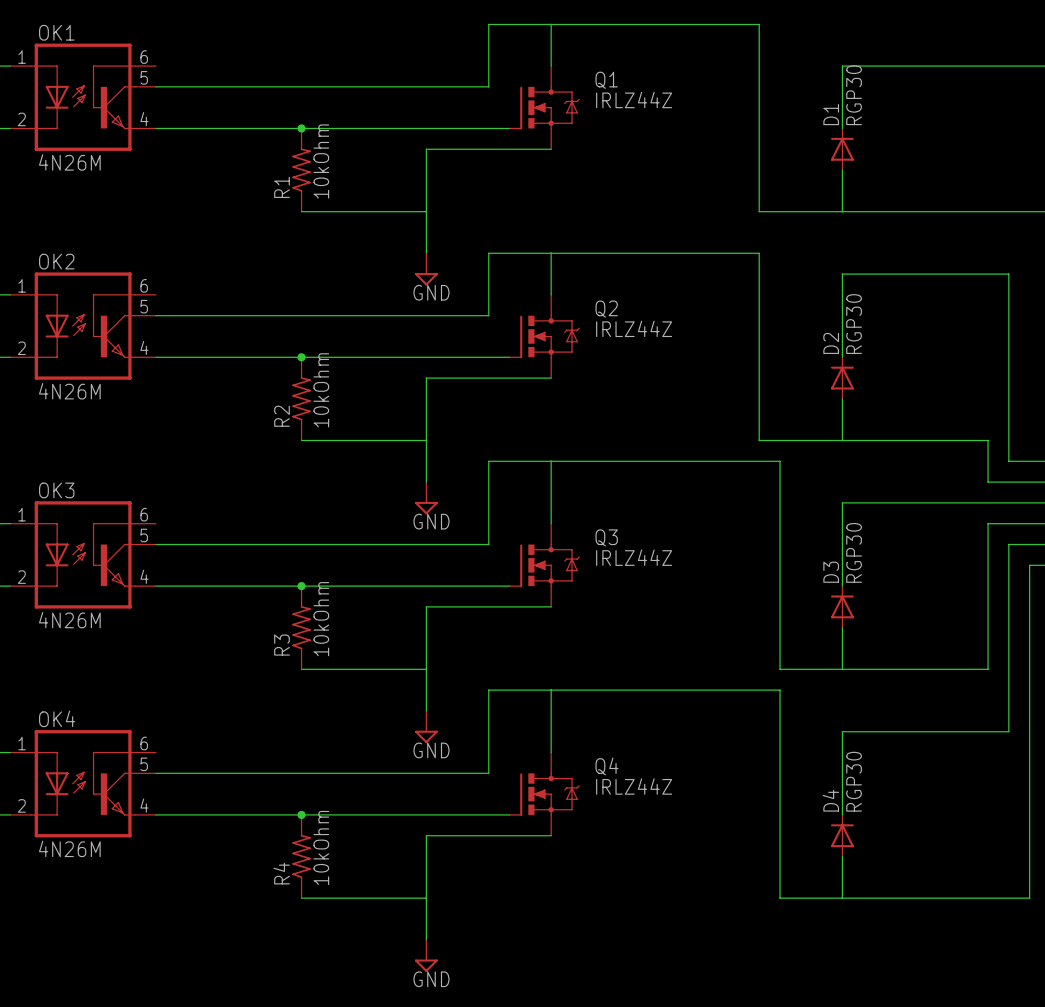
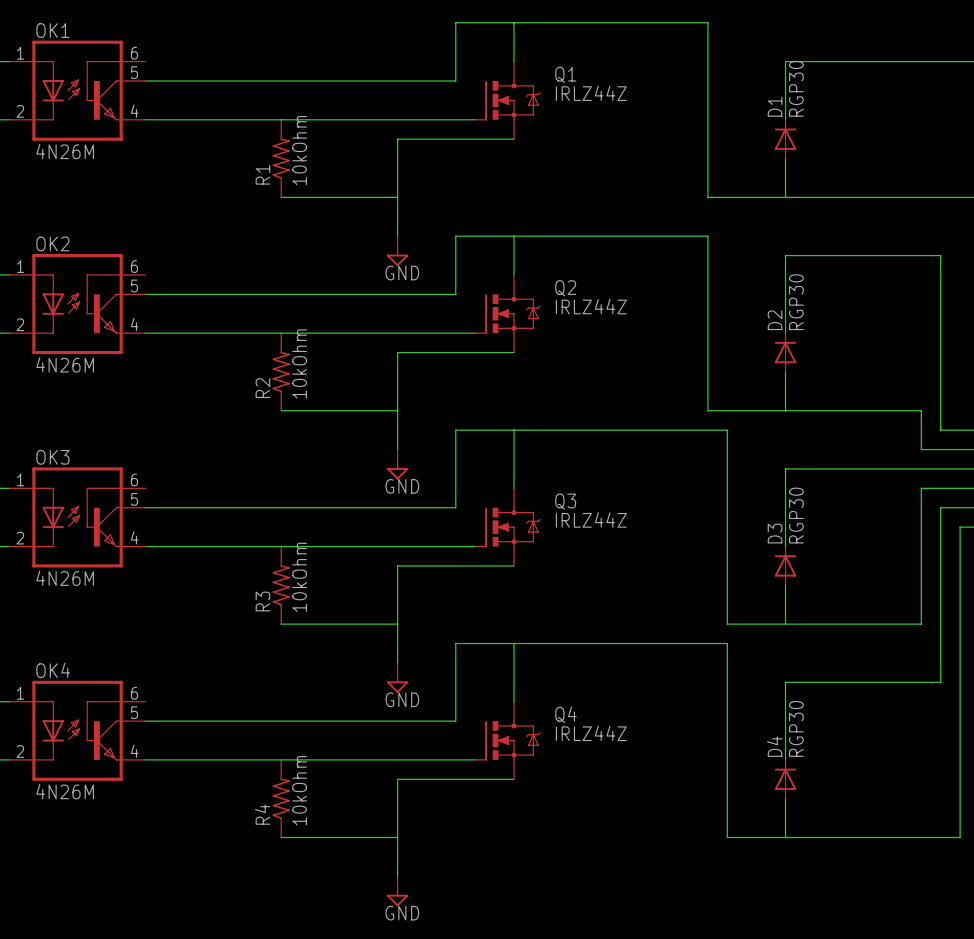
junction: (301, 128) -> none
junction: (301, 357) -> none
junction: (301, 586) -> none
junction: (301, 814) -> none

